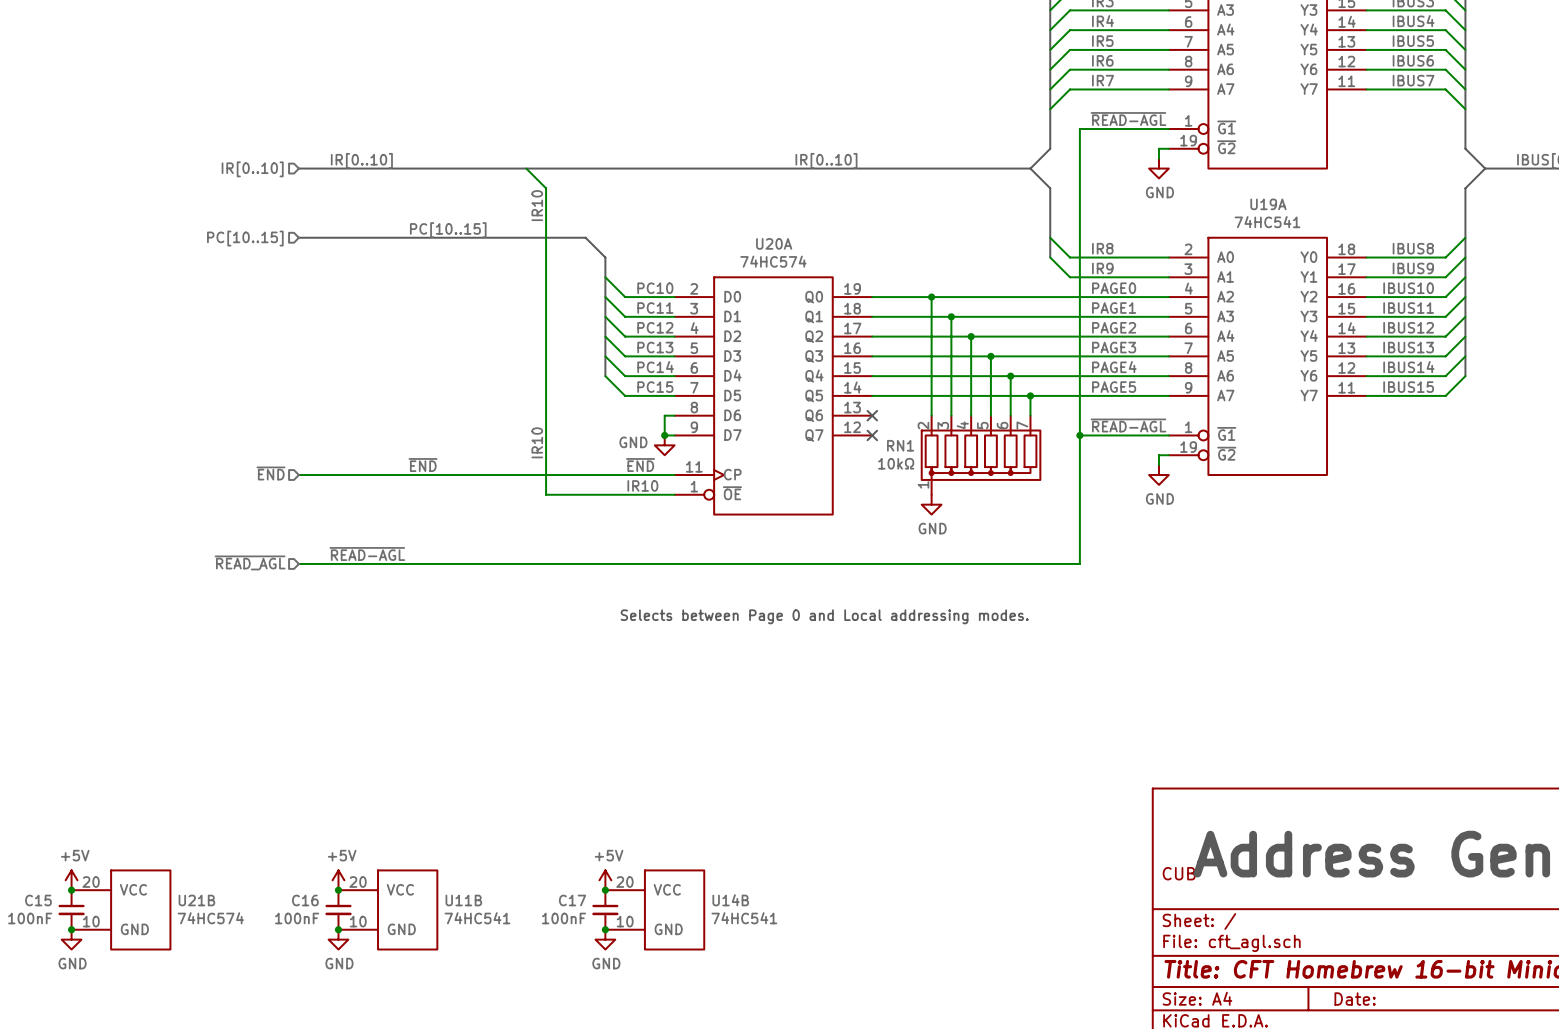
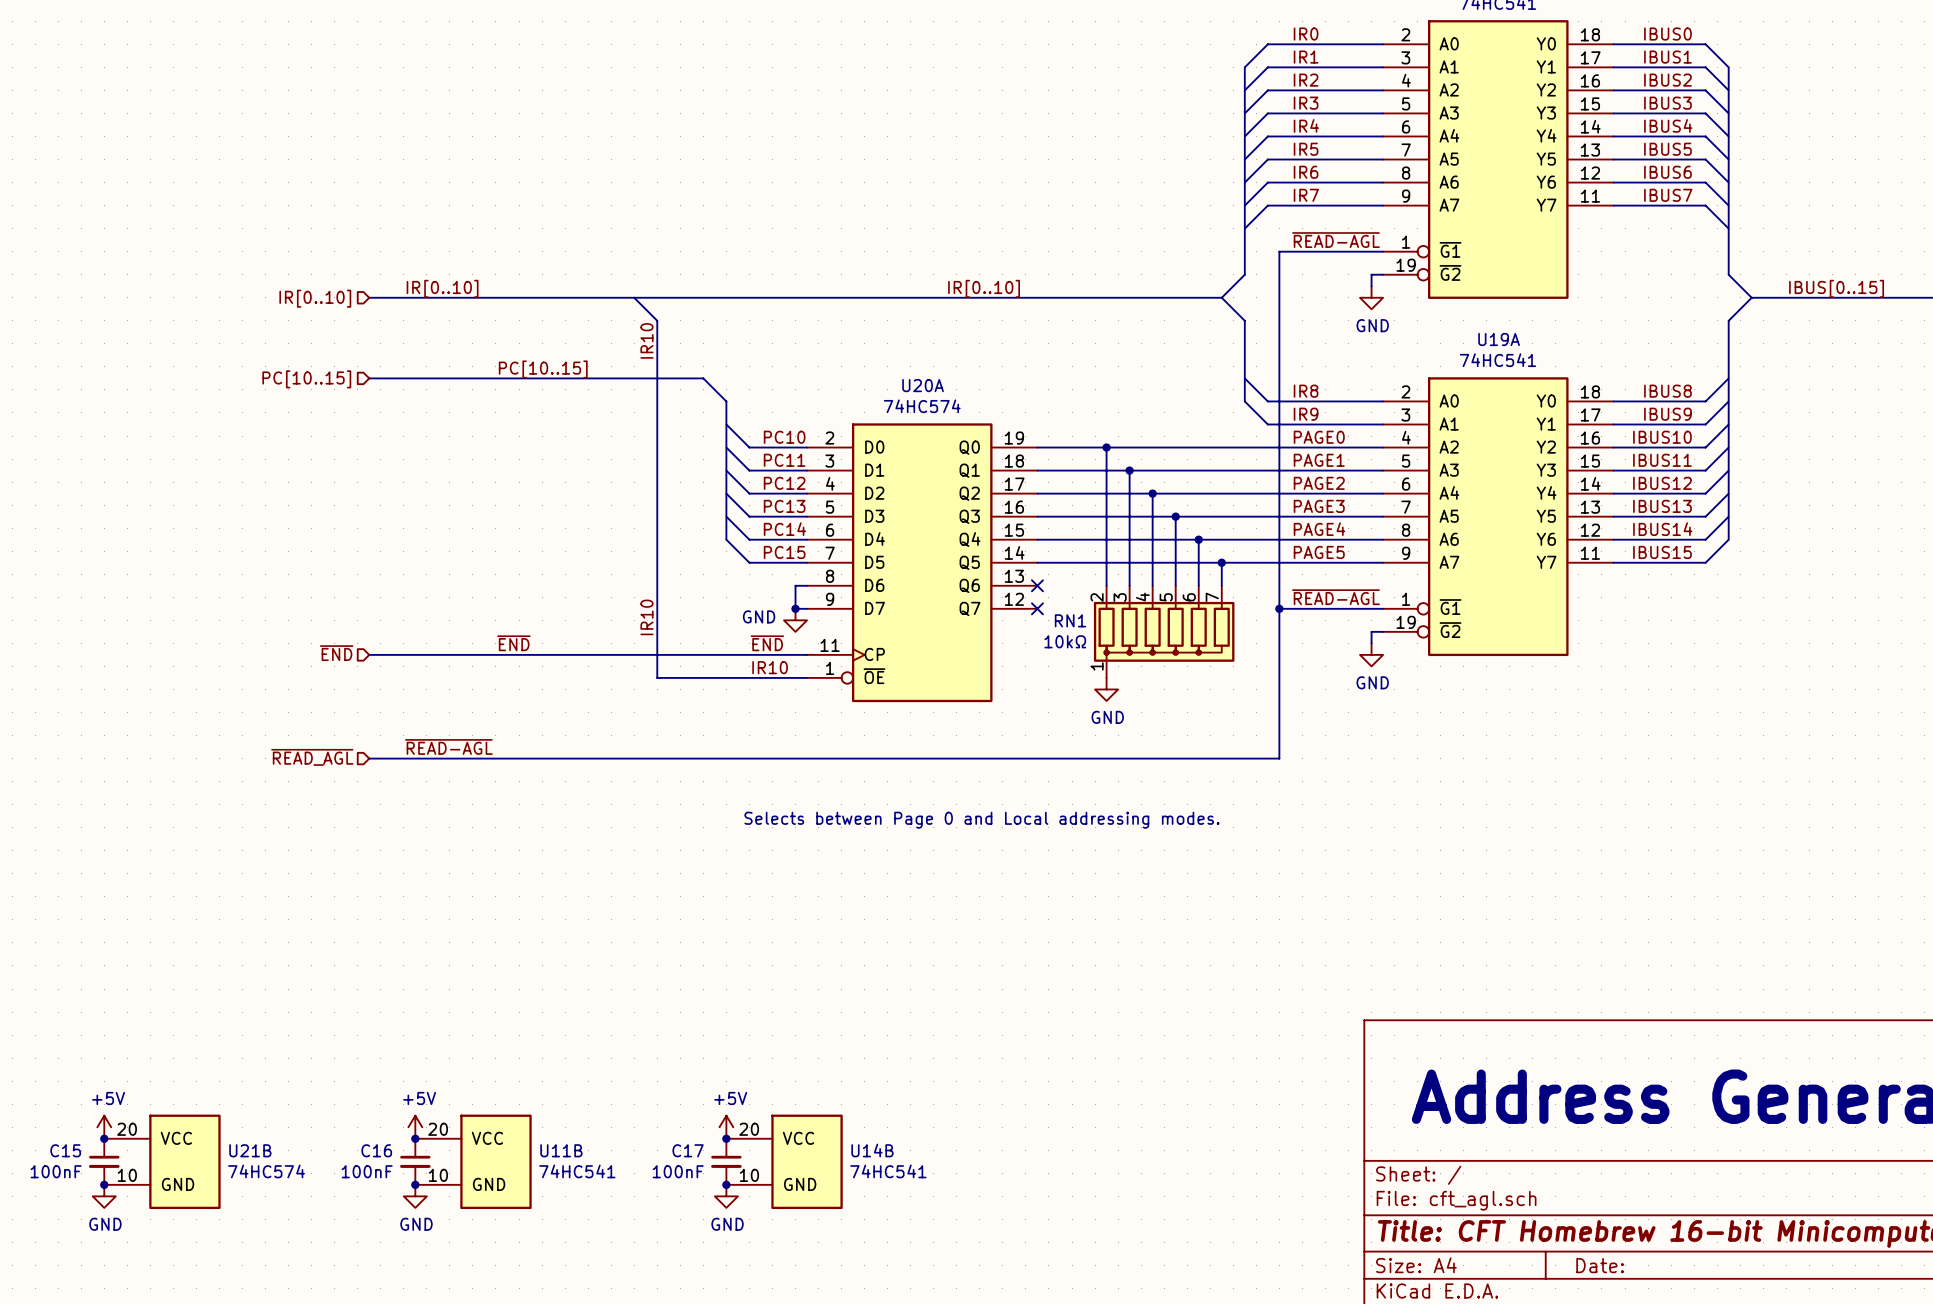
title block: CUB (1179, 873) -> none

